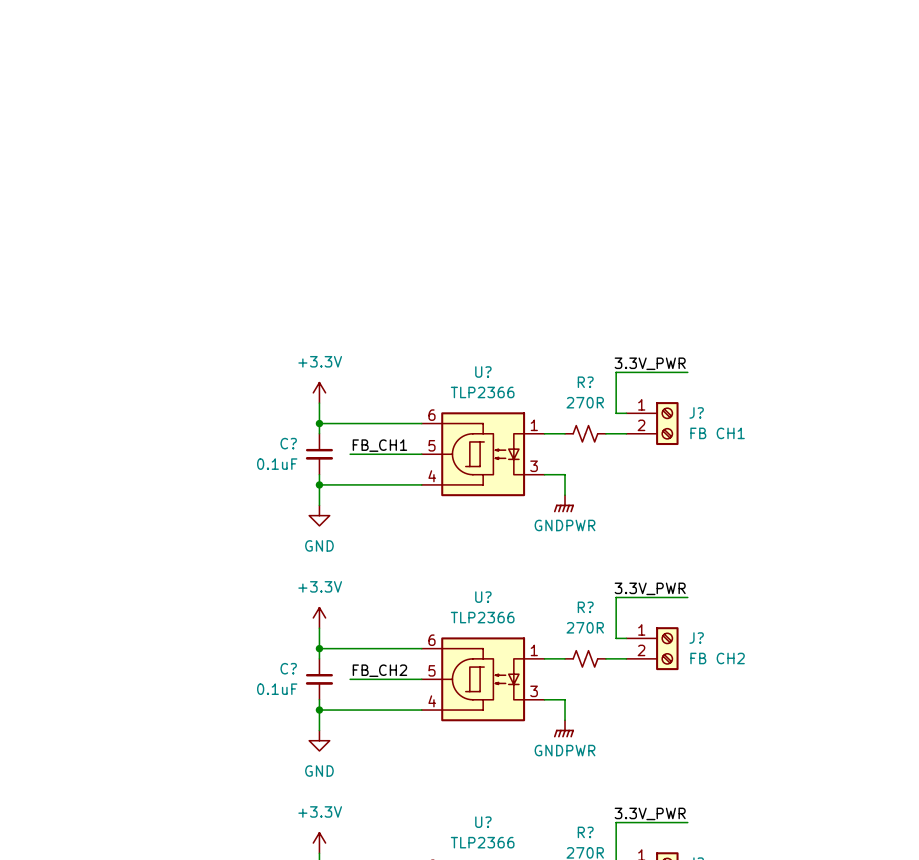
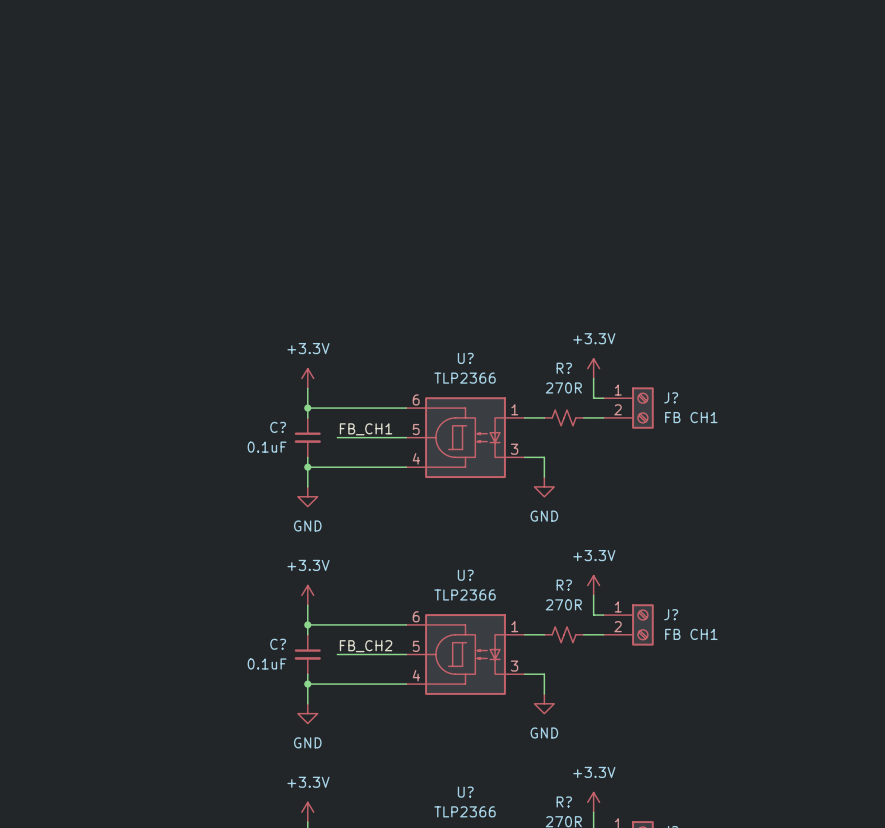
label: 3.3V_PWR (650, 363) -> none
wire: (687, 372) (616, 372) (616, 392) -> none
power symbol: none -> +3.3V (593, 368)
power symbol: GNDPWR (563, 503) -> GND (544, 486)
label: 3.3V_PWR (650, 588) -> none
wire: (687, 597) (616, 597) (616, 617) -> none
power symbol: none -> +3.3V (593, 585)
J? value: FB CH2 (717, 658) -> FB CH1 (691, 634)
power symbol: GNDPWR (563, 728) -> GND (544, 703)
label: 3.3V_PWR (650, 813) -> none
wire: (687, 822) (616, 822) (616, 843) -> none
power symbol: none -> +3.3V (593, 802)

